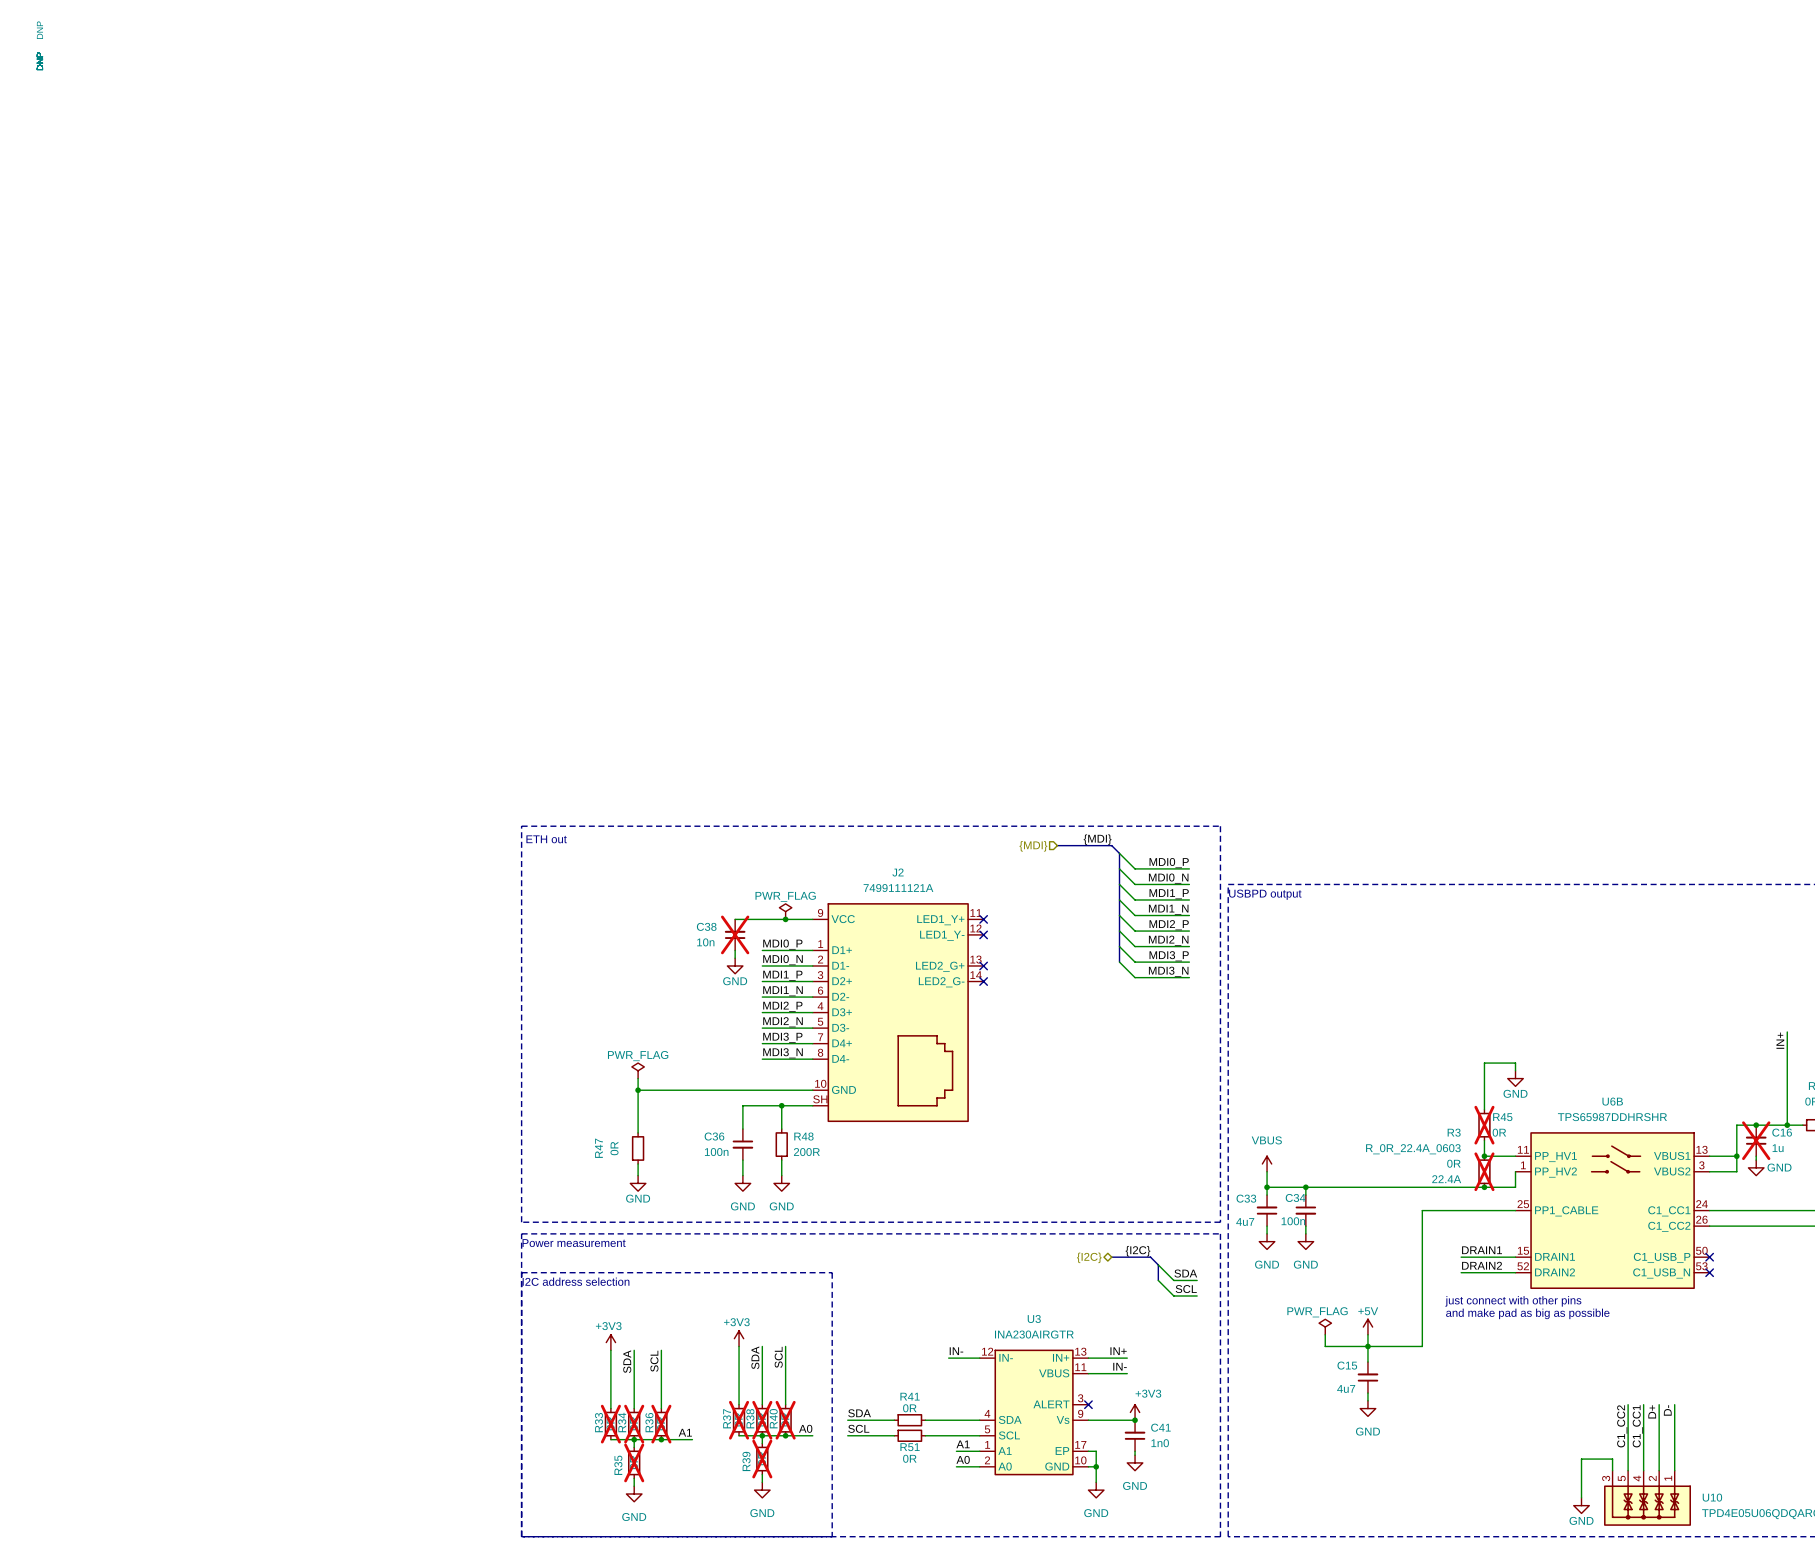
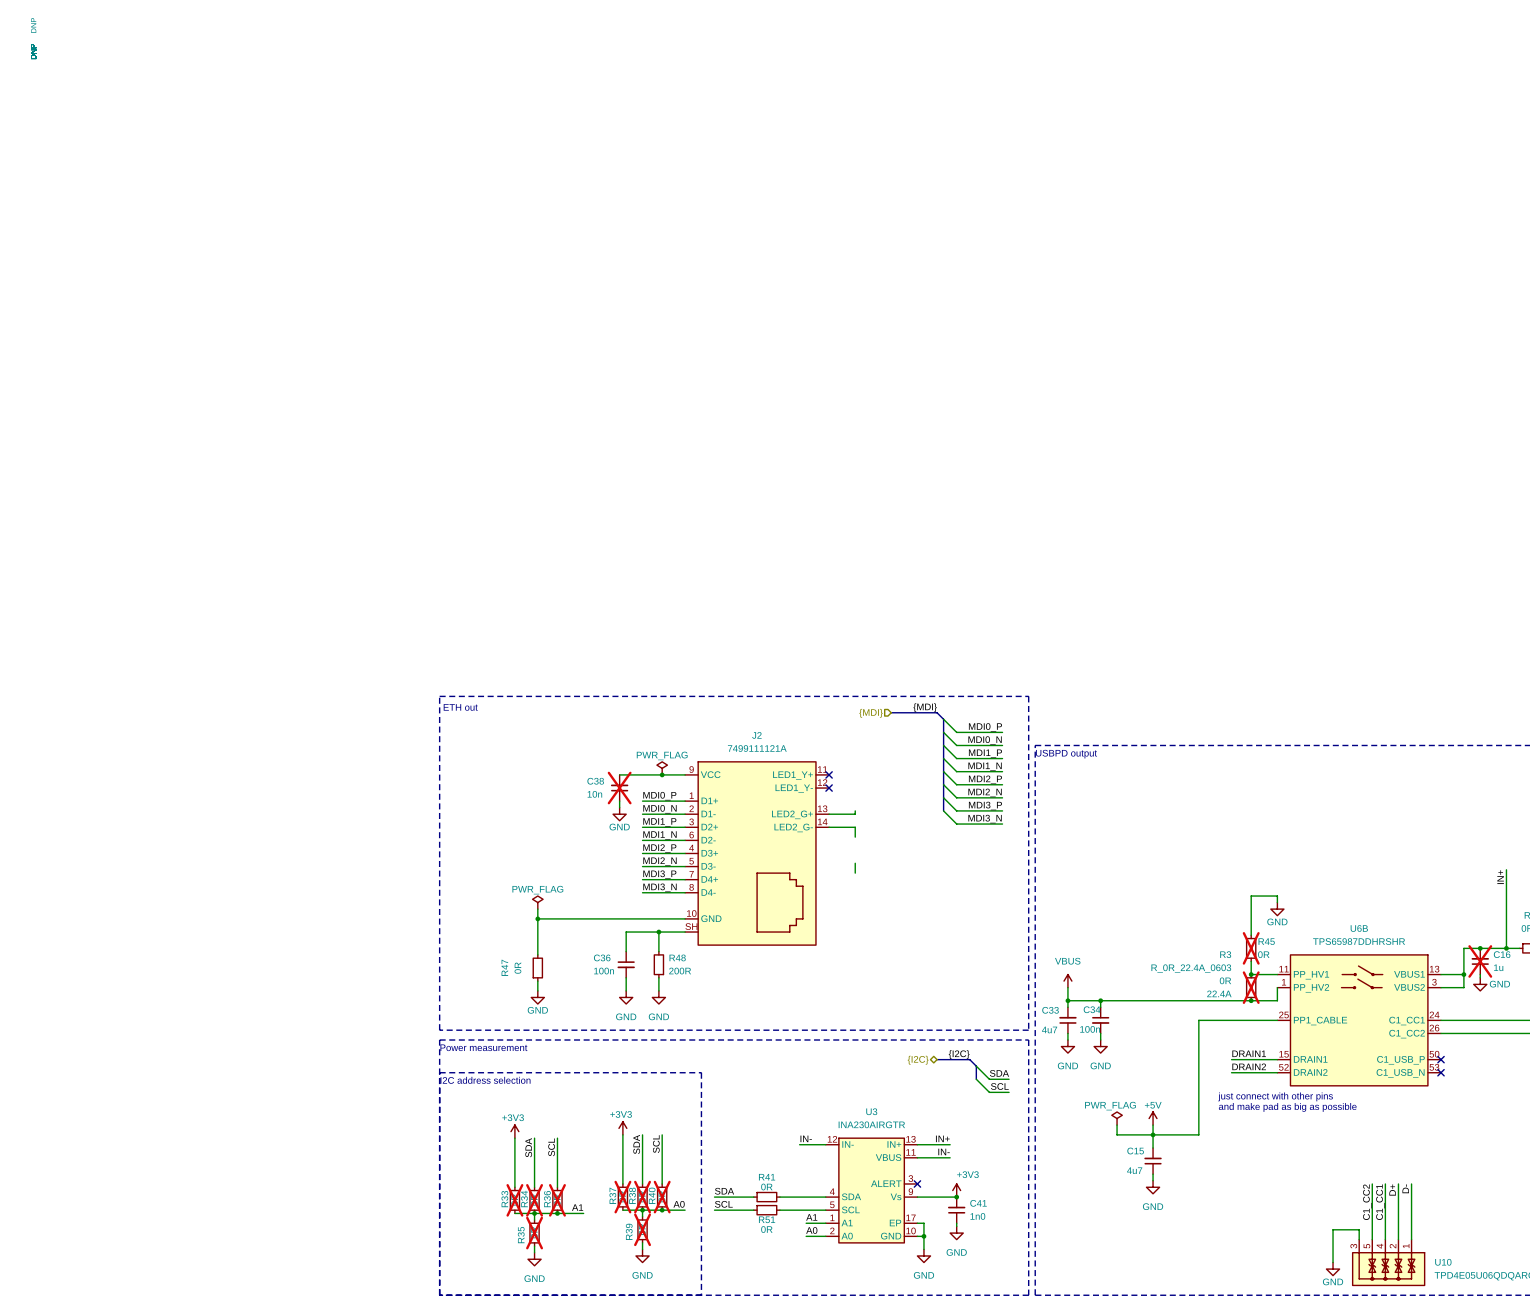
wire: none -> (855, 810) (855, 814) (829, 814)
no-connect mark: (983, 965) -> none
wire: none -> (829, 827) (855, 827) (855, 837)
no-connect mark: (983, 981) -> none
wire: none -> (855, 863) (855, 873)

